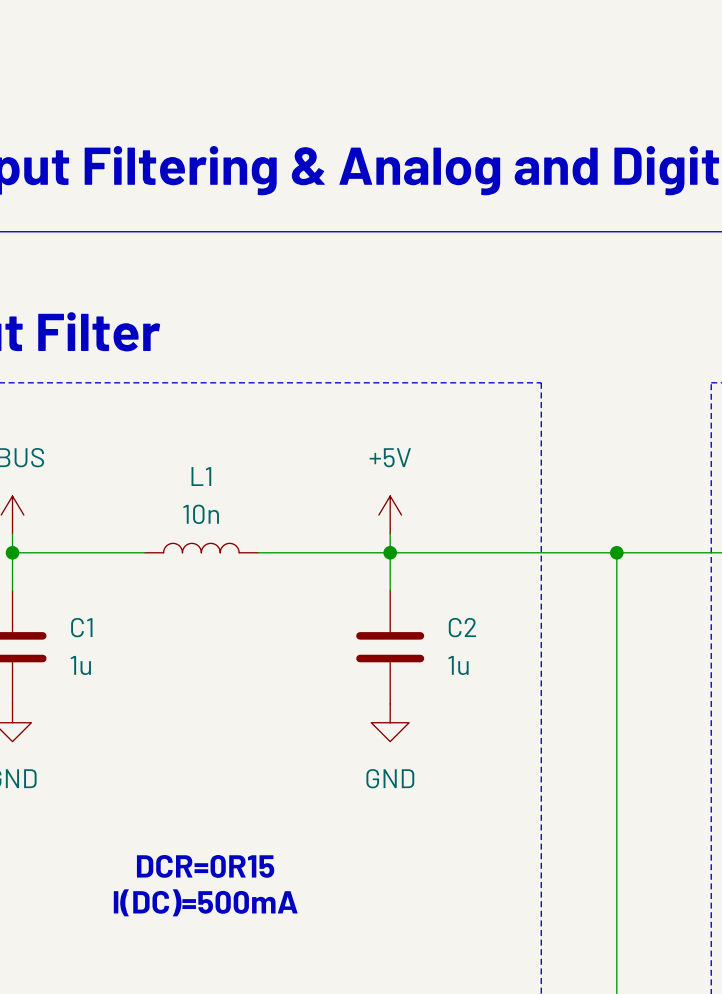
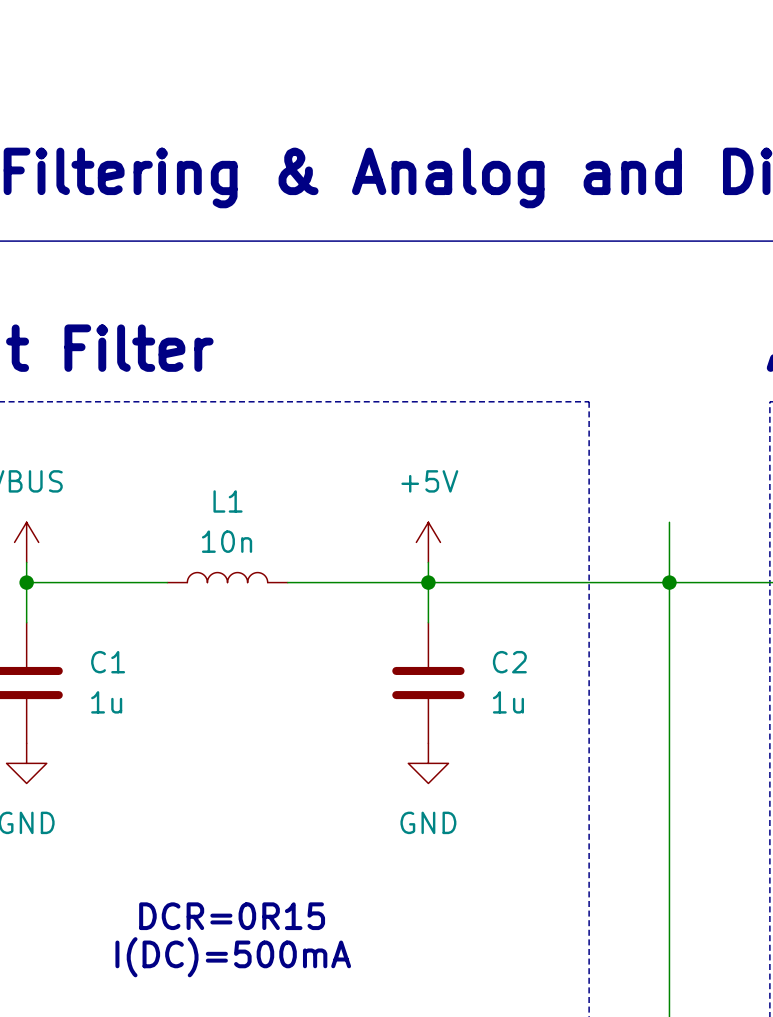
wire: none -> (669, 522) (669, 582)

